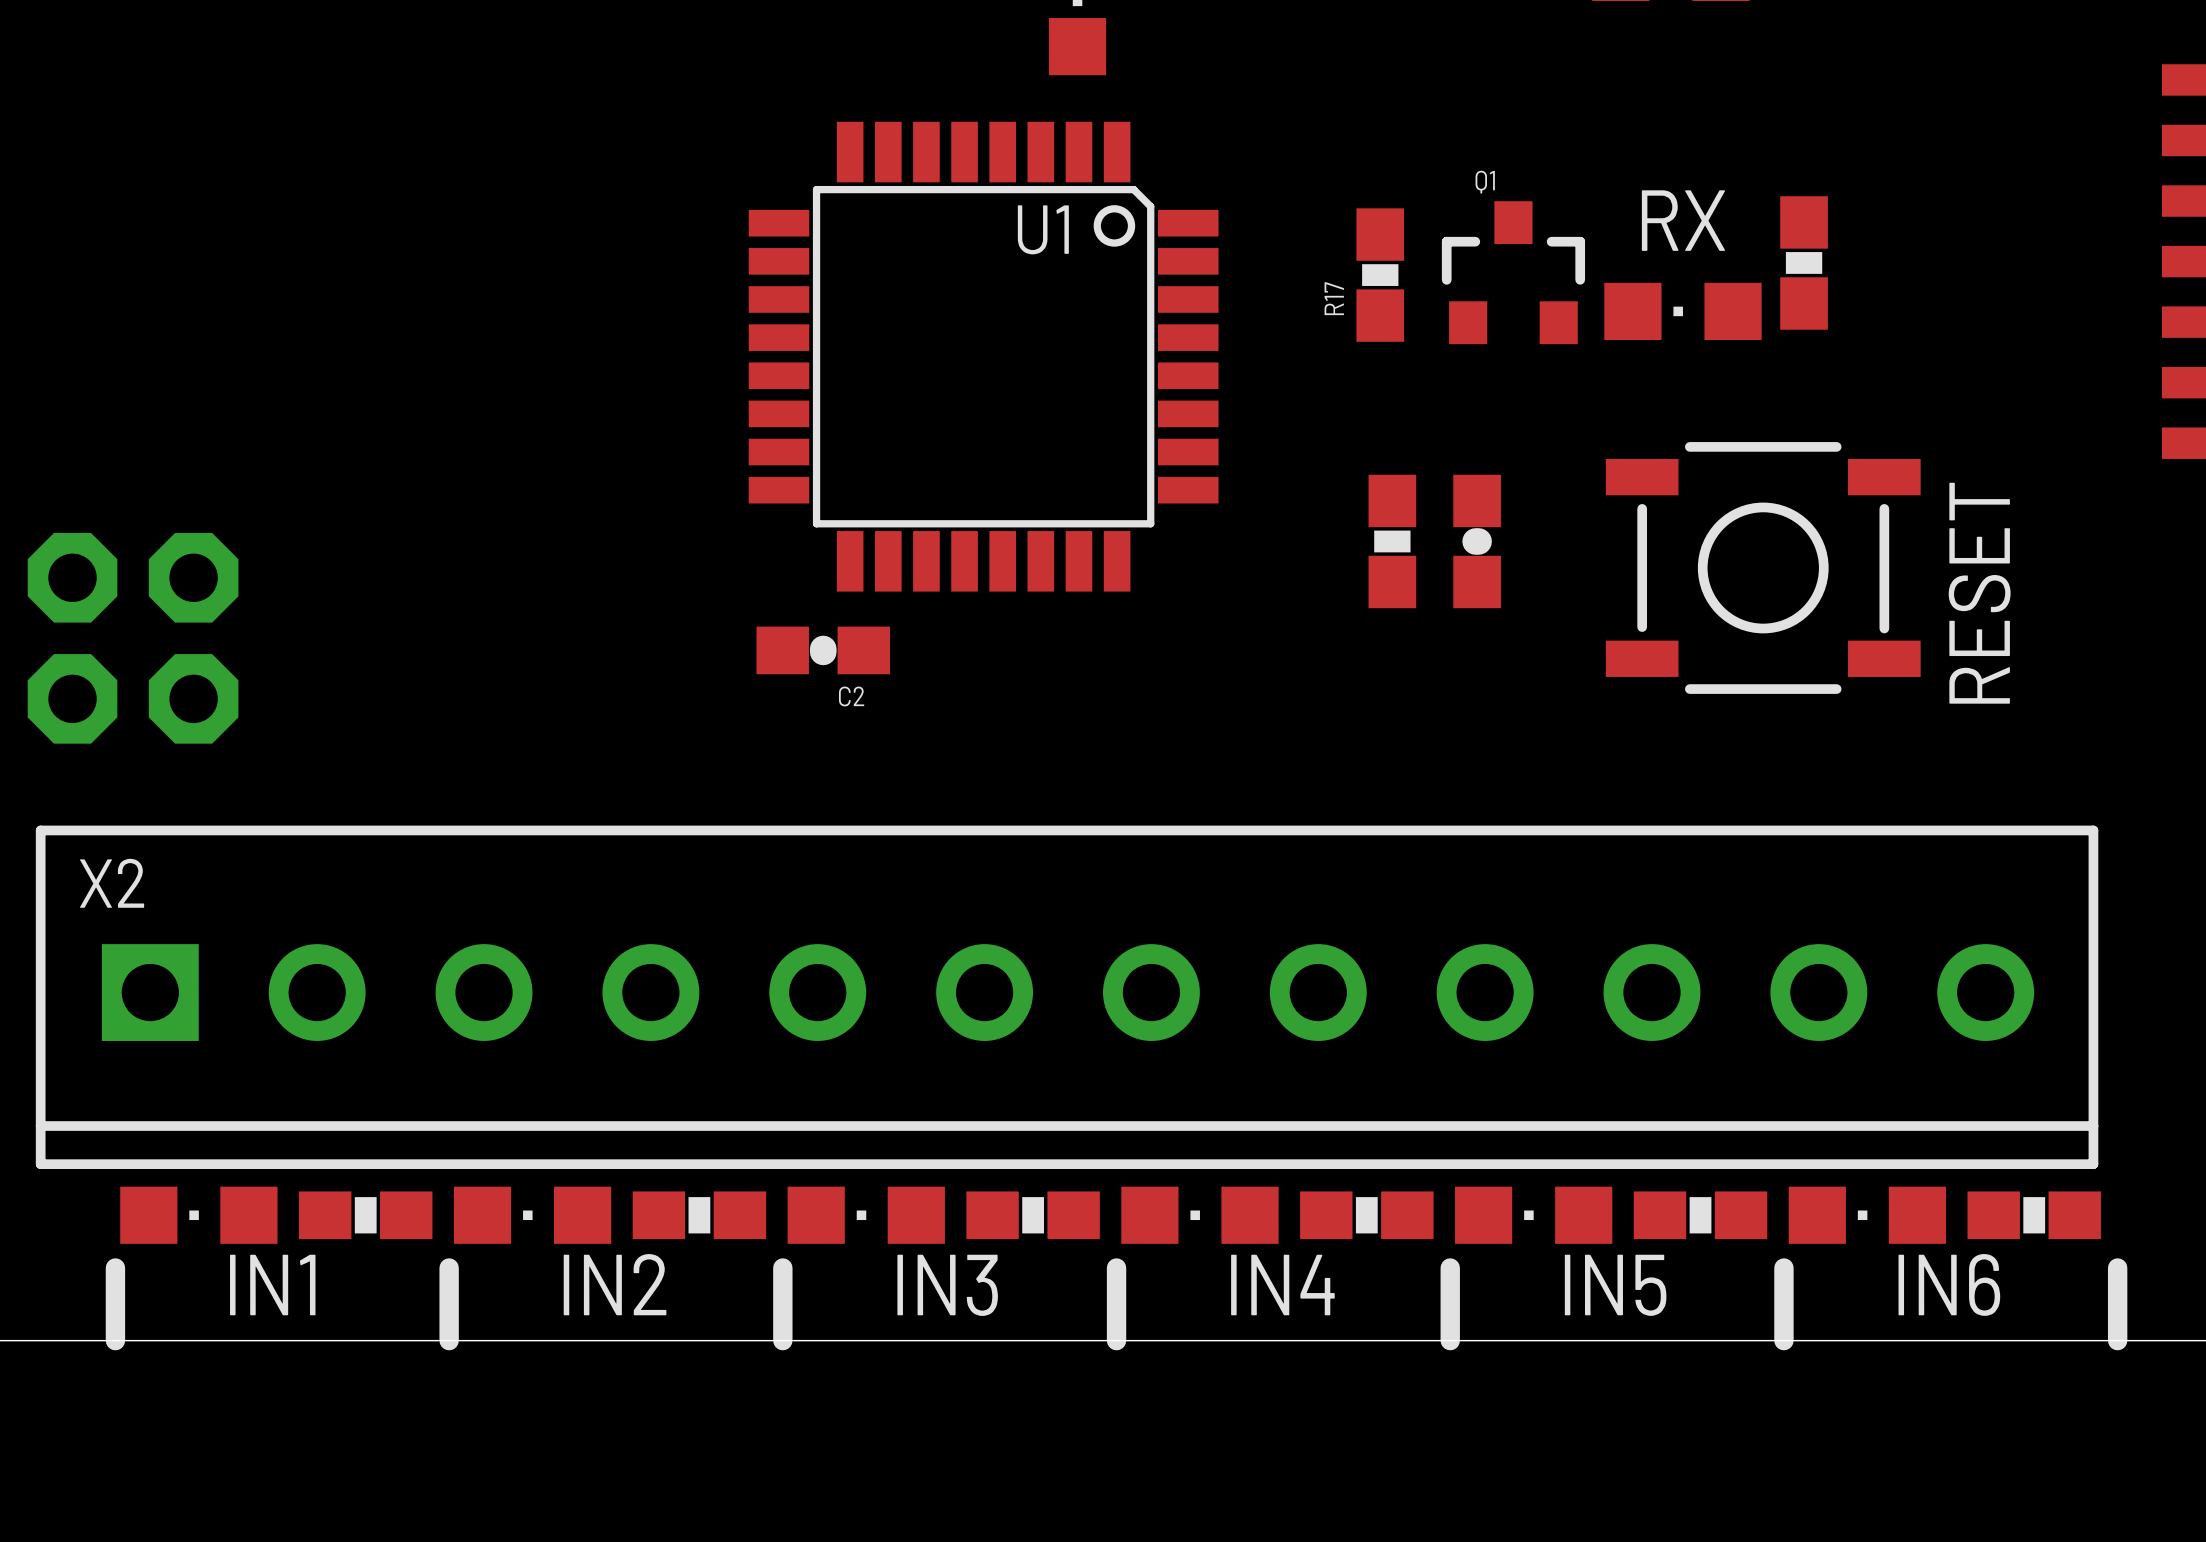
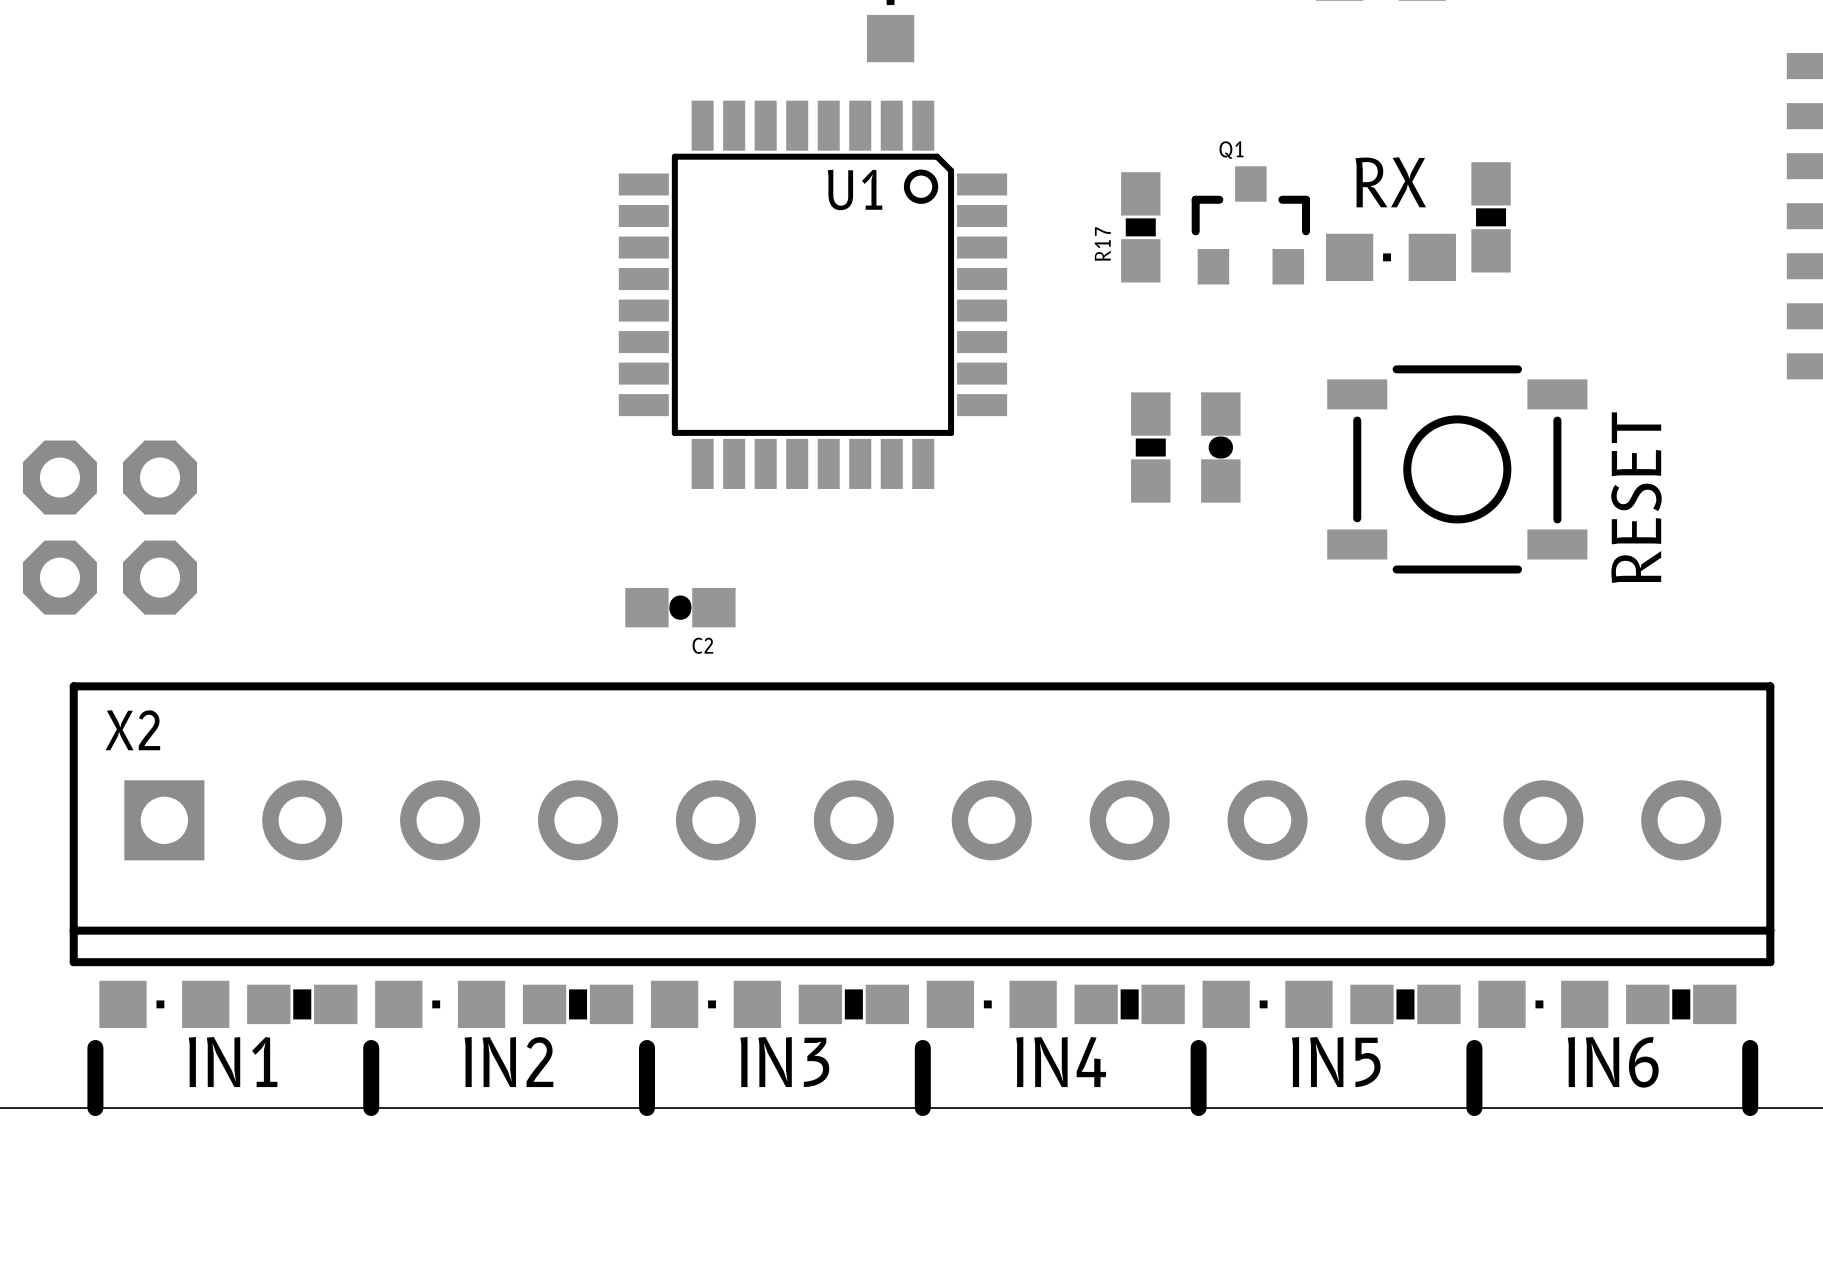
C2 position: (823, 650) -> (680, 607)
X2 position: (1067, 997) -> (922, 824)

